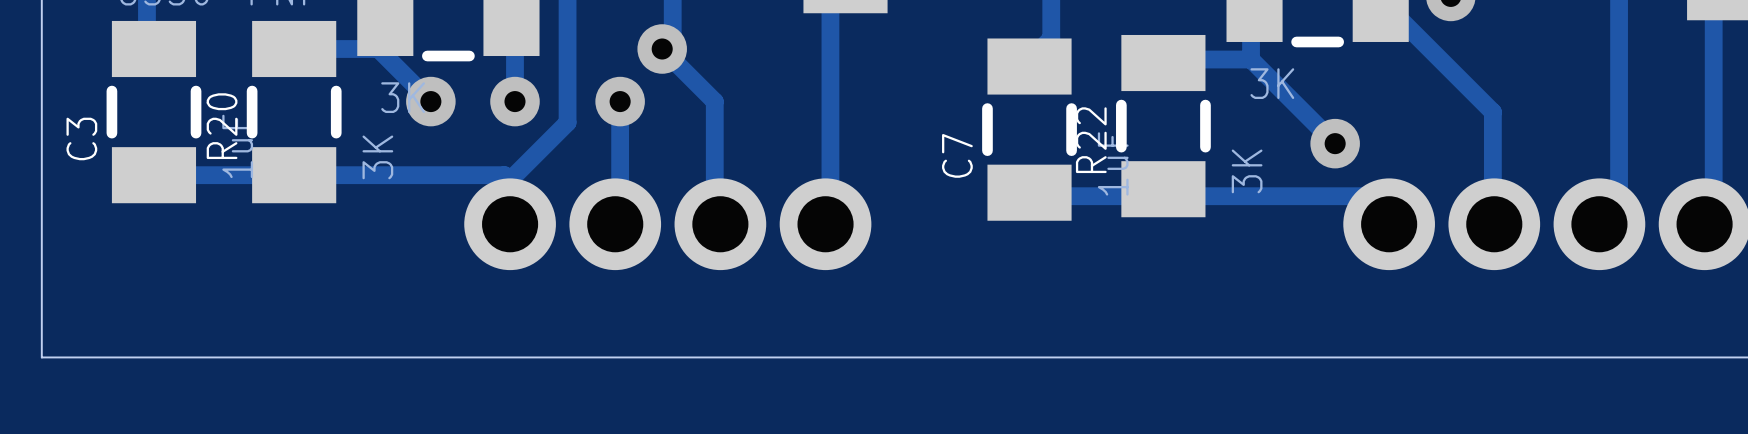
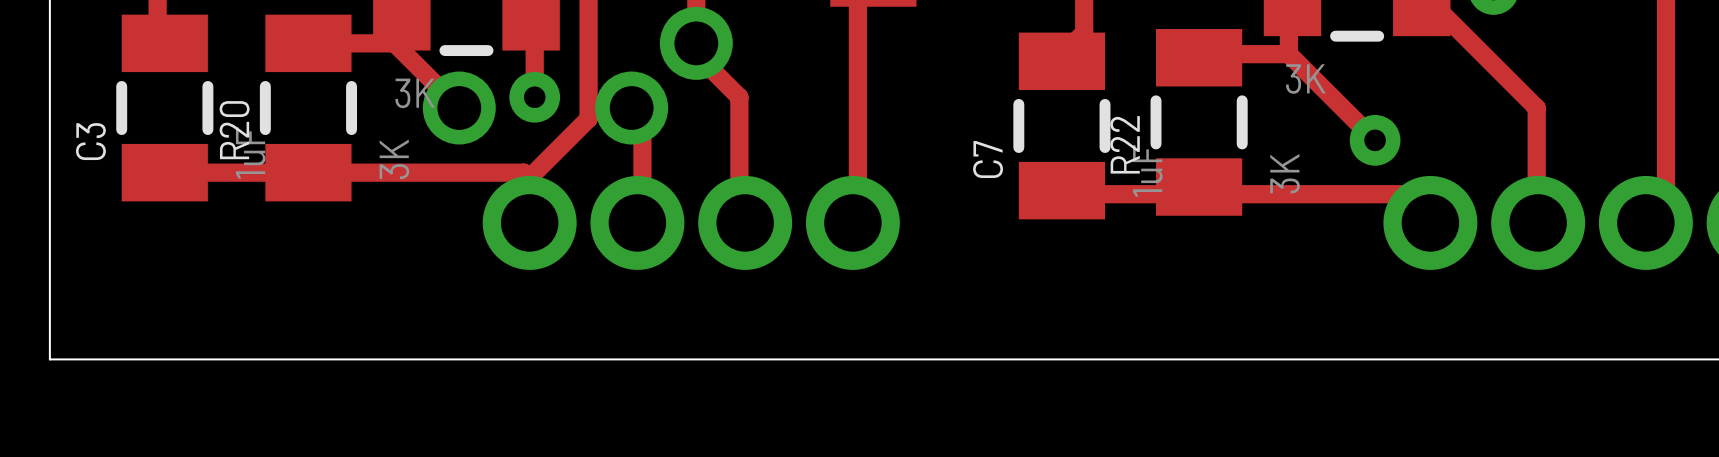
via size: [637, 24, 687, 74] -> [659, 6, 733, 80]
via size: [406, 76, 456, 127] -> [422, 71, 496, 145]
via size: [595, 76, 645, 127] -> [595, 71, 669, 145]

